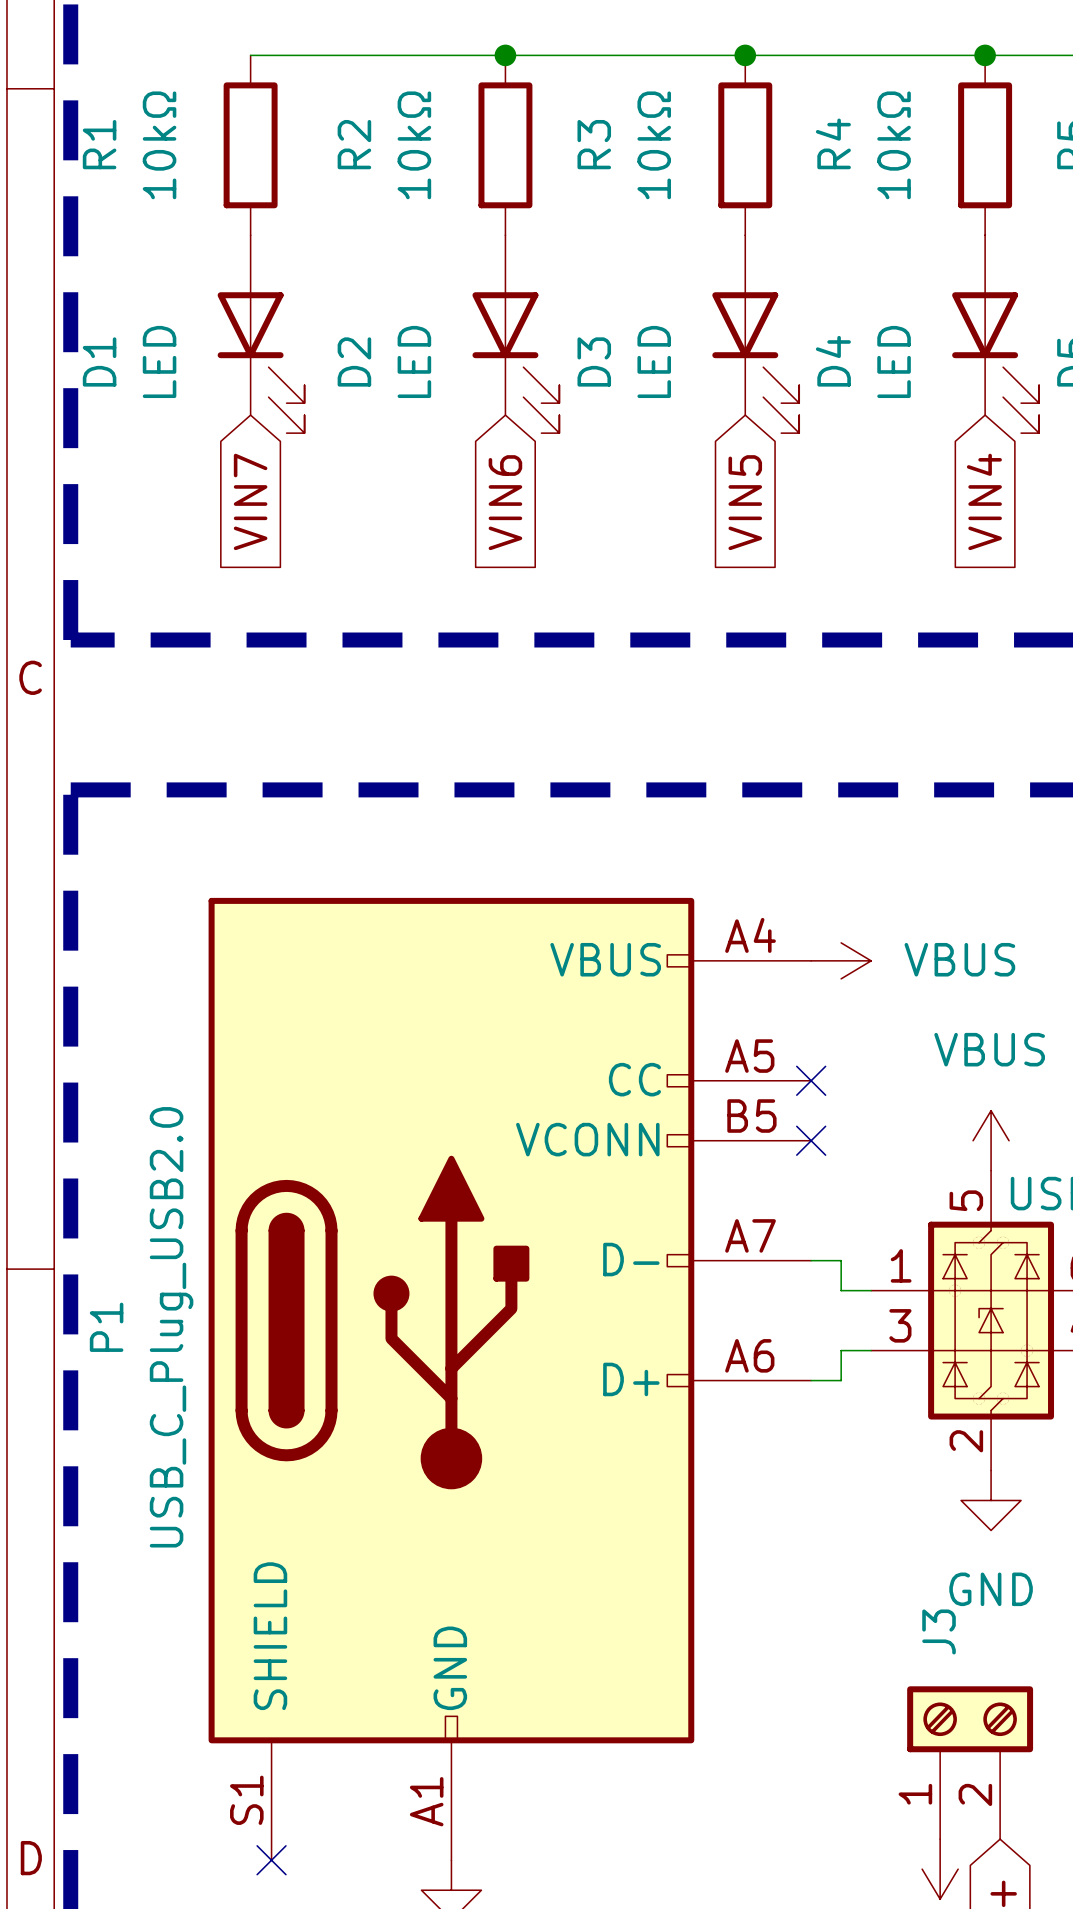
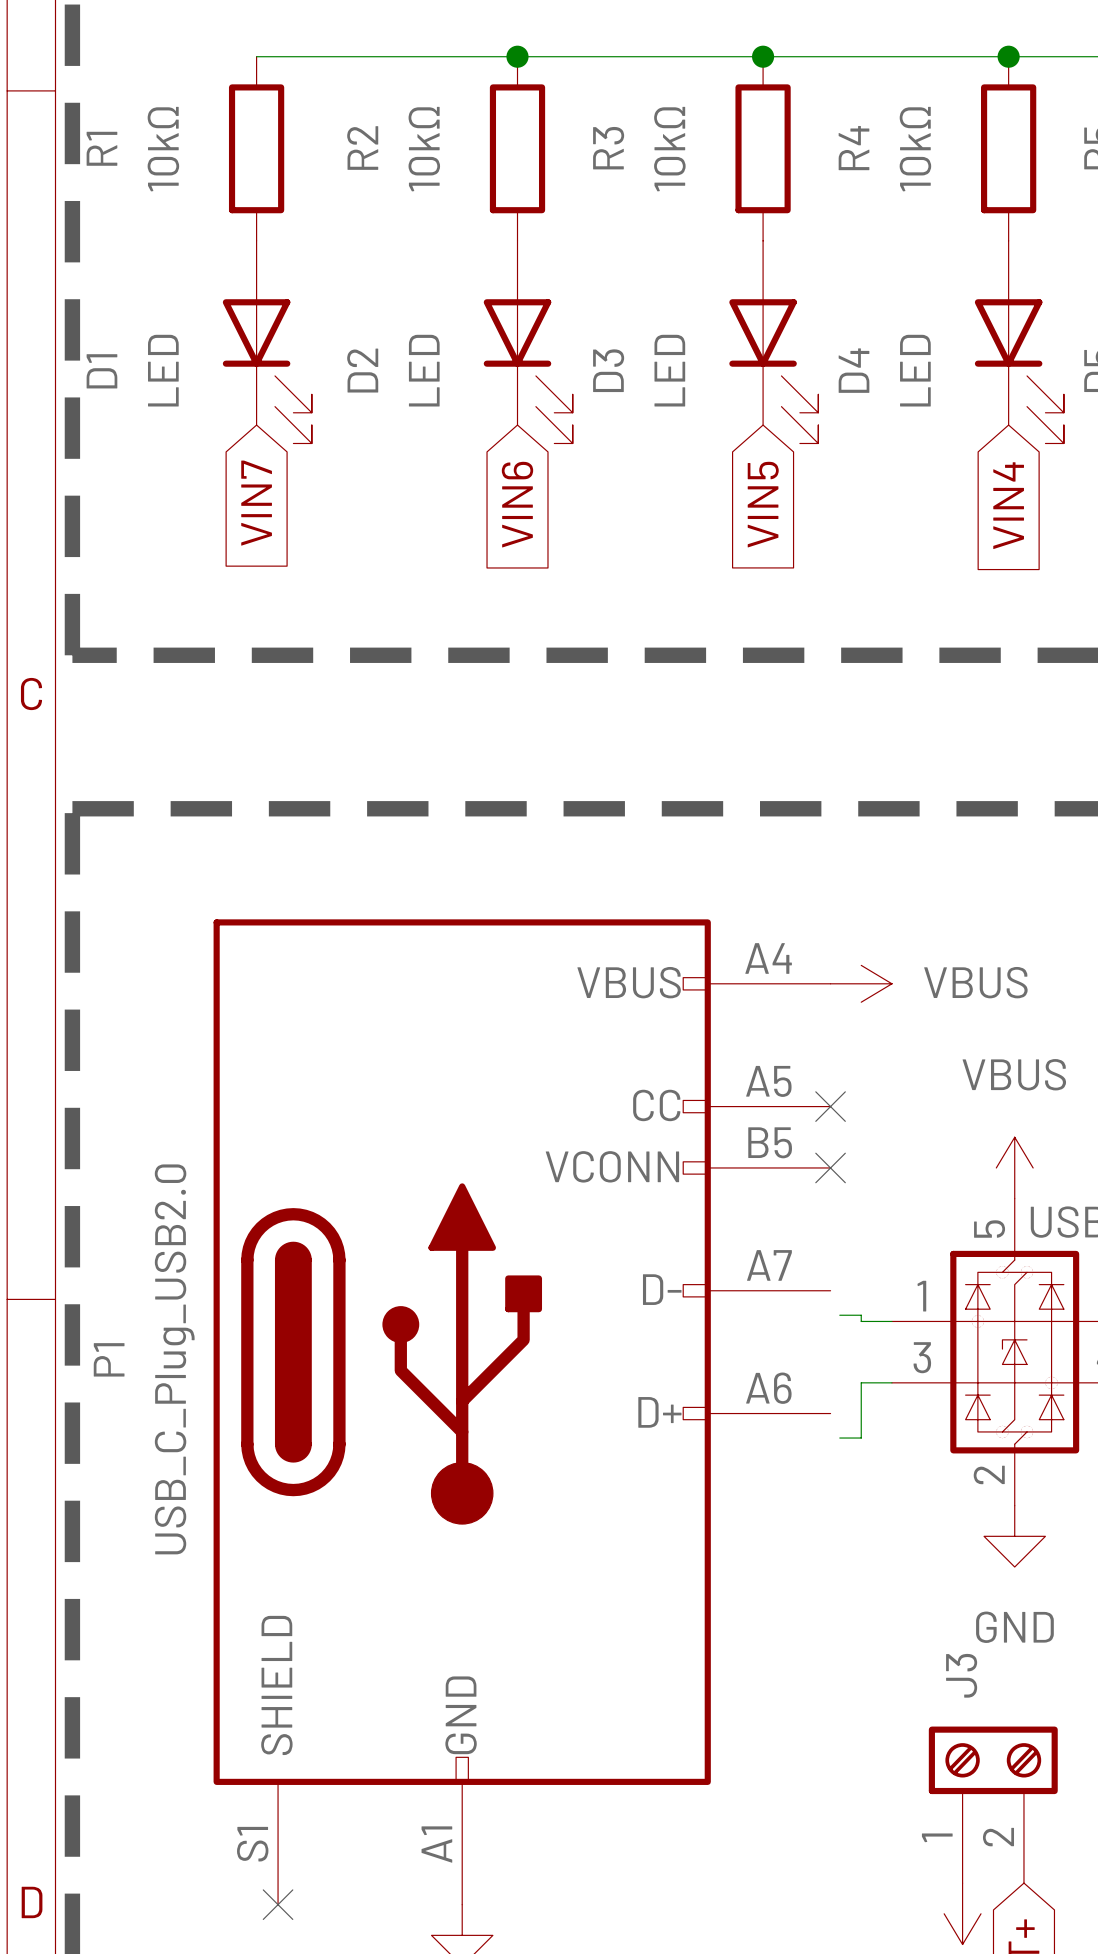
wire: (811, 1260) (841, 1260) (841, 1284) -> (839, 1315) (861, 1315)
wire: (811, 1380) (841, 1380) -> (839, 1438) (861, 1438) (861, 1413)

